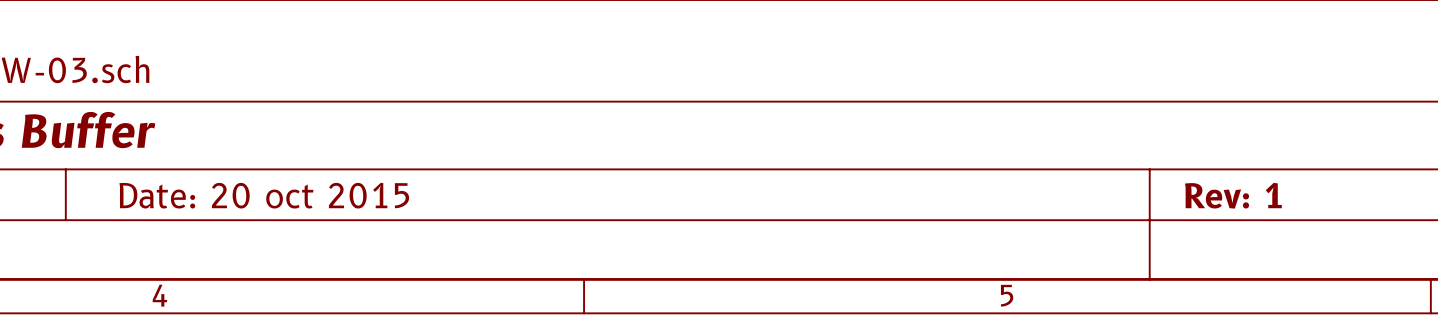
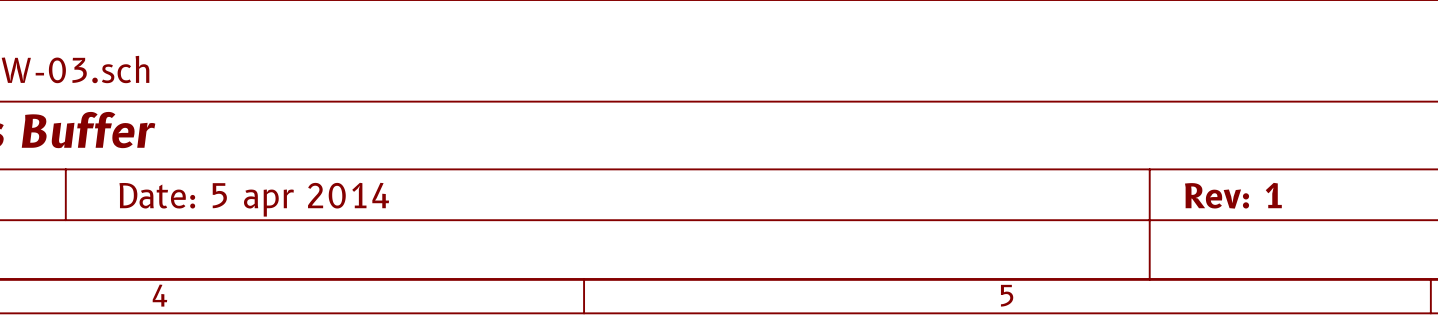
title block: Date: 20 oct 2015 (264, 195) -> Date: 5 apr 2014 (254, 199)

